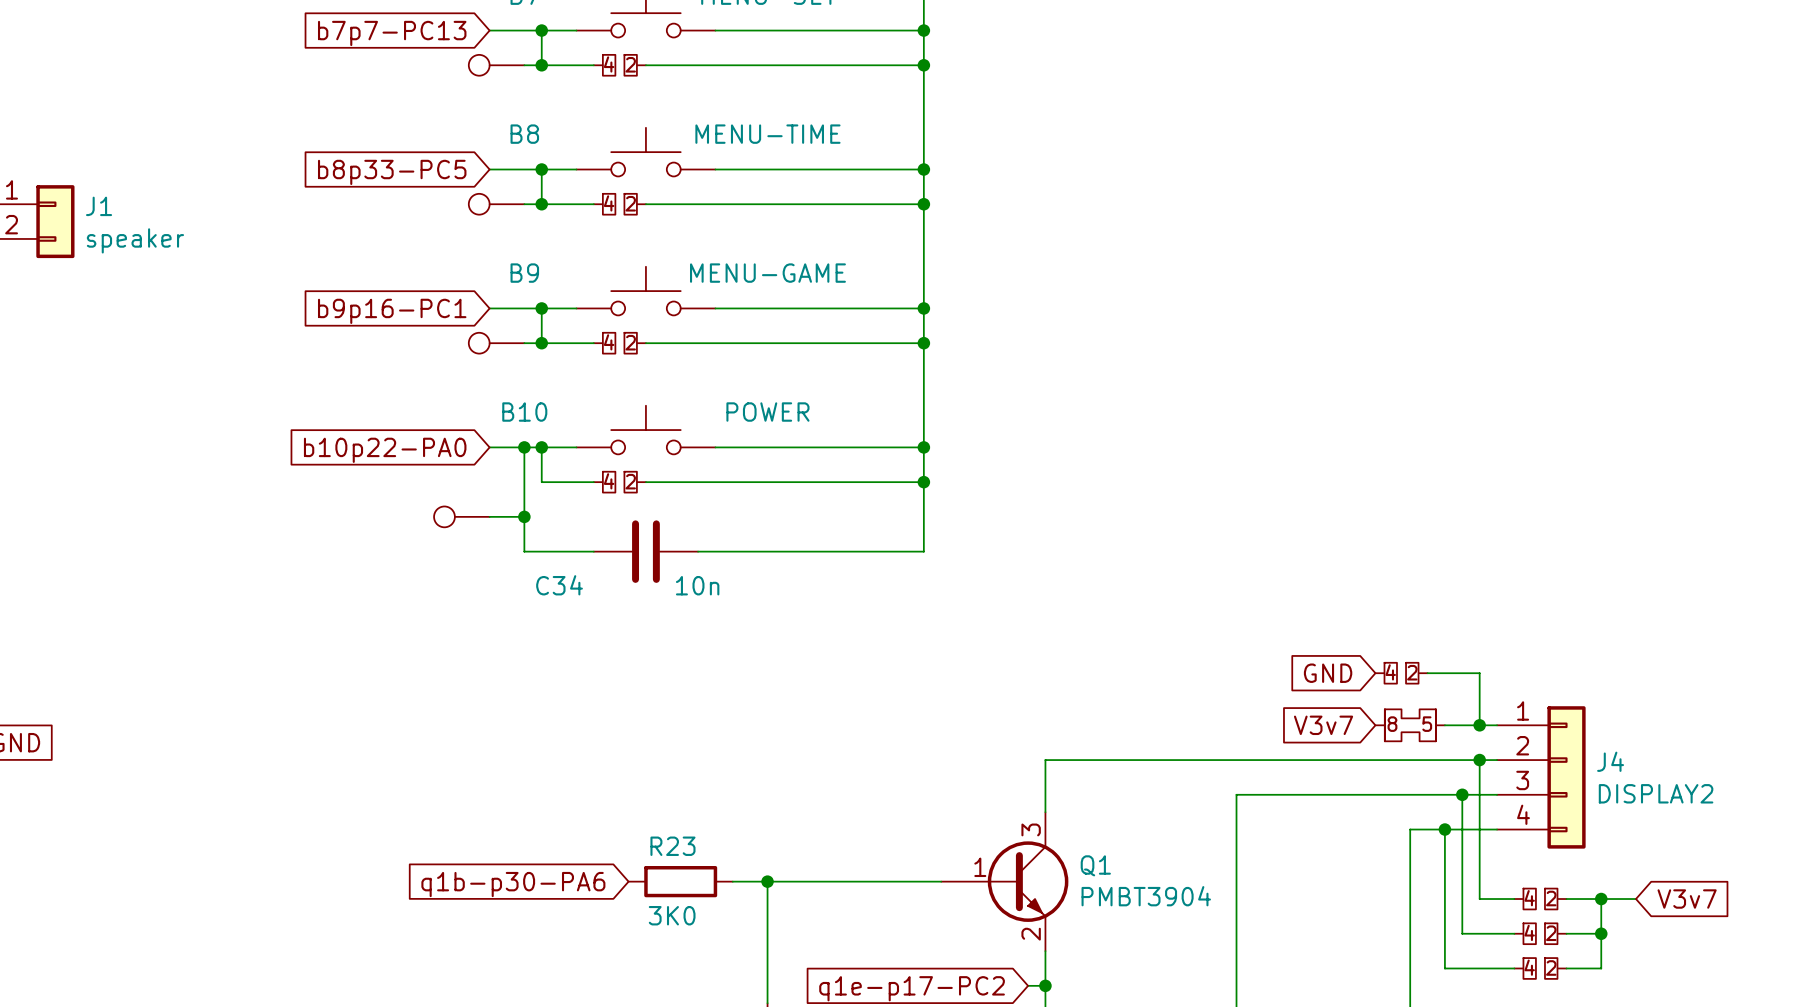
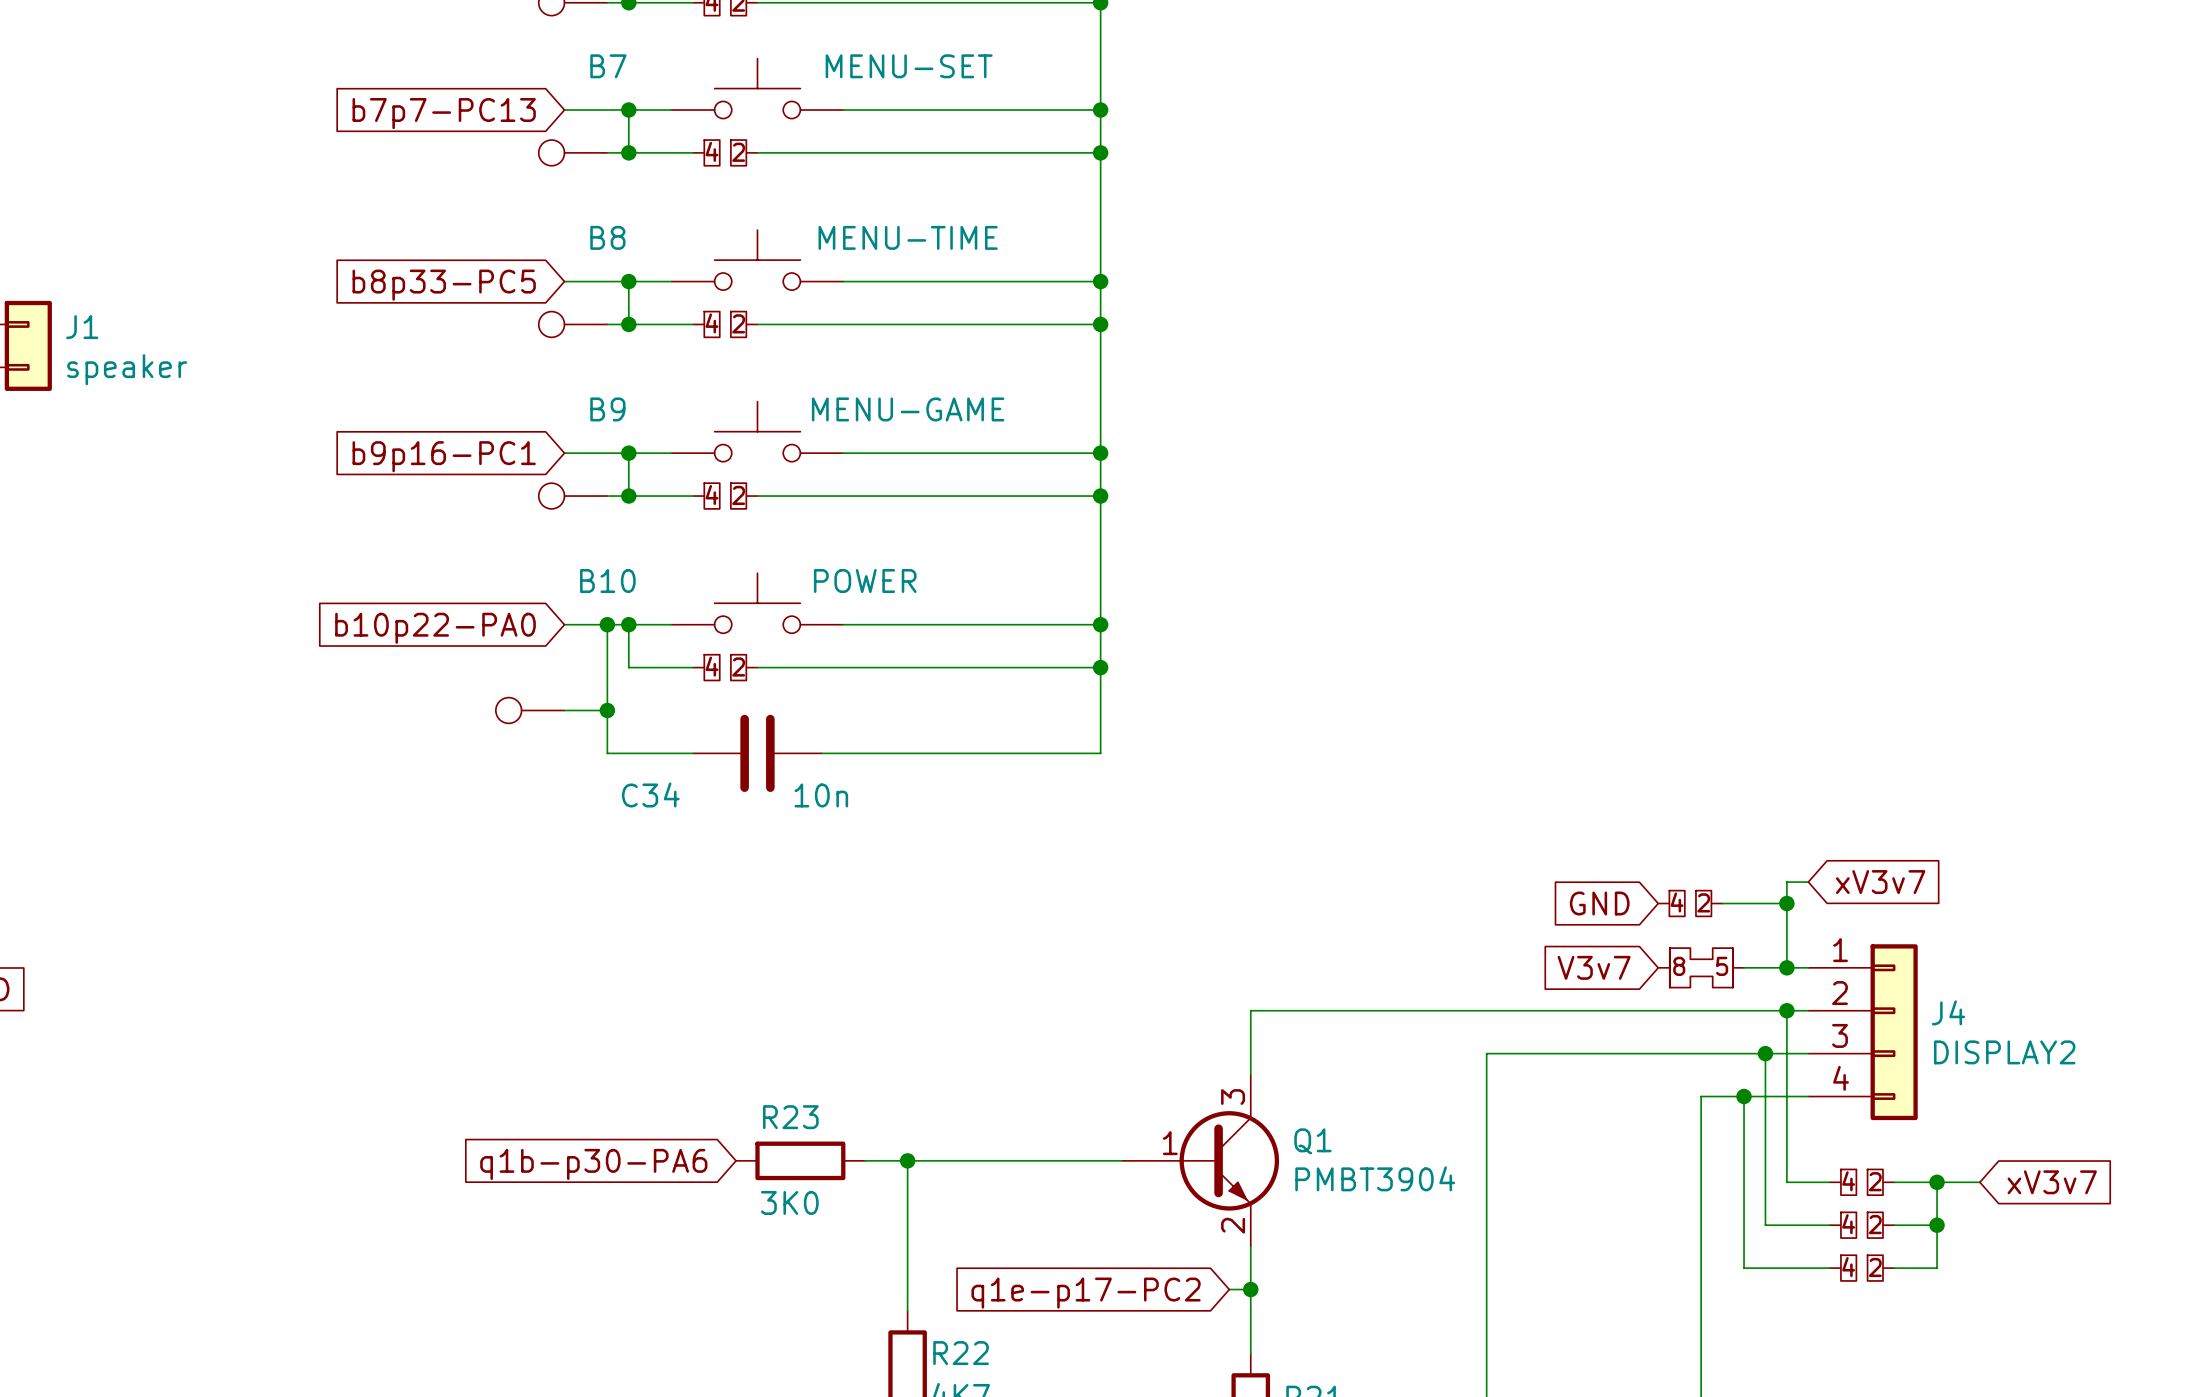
B10 value position: POWER (767, 412) -> POWER (865, 581)
wire: none -> (1808, 882) (1786, 882) (1786, 903)
global label: none -> xV3v7 (1880, 882)
junction: none -> (1786, 903)
global label: V3v7 (1687, 899) -> xV3v7 (2052, 1182)

